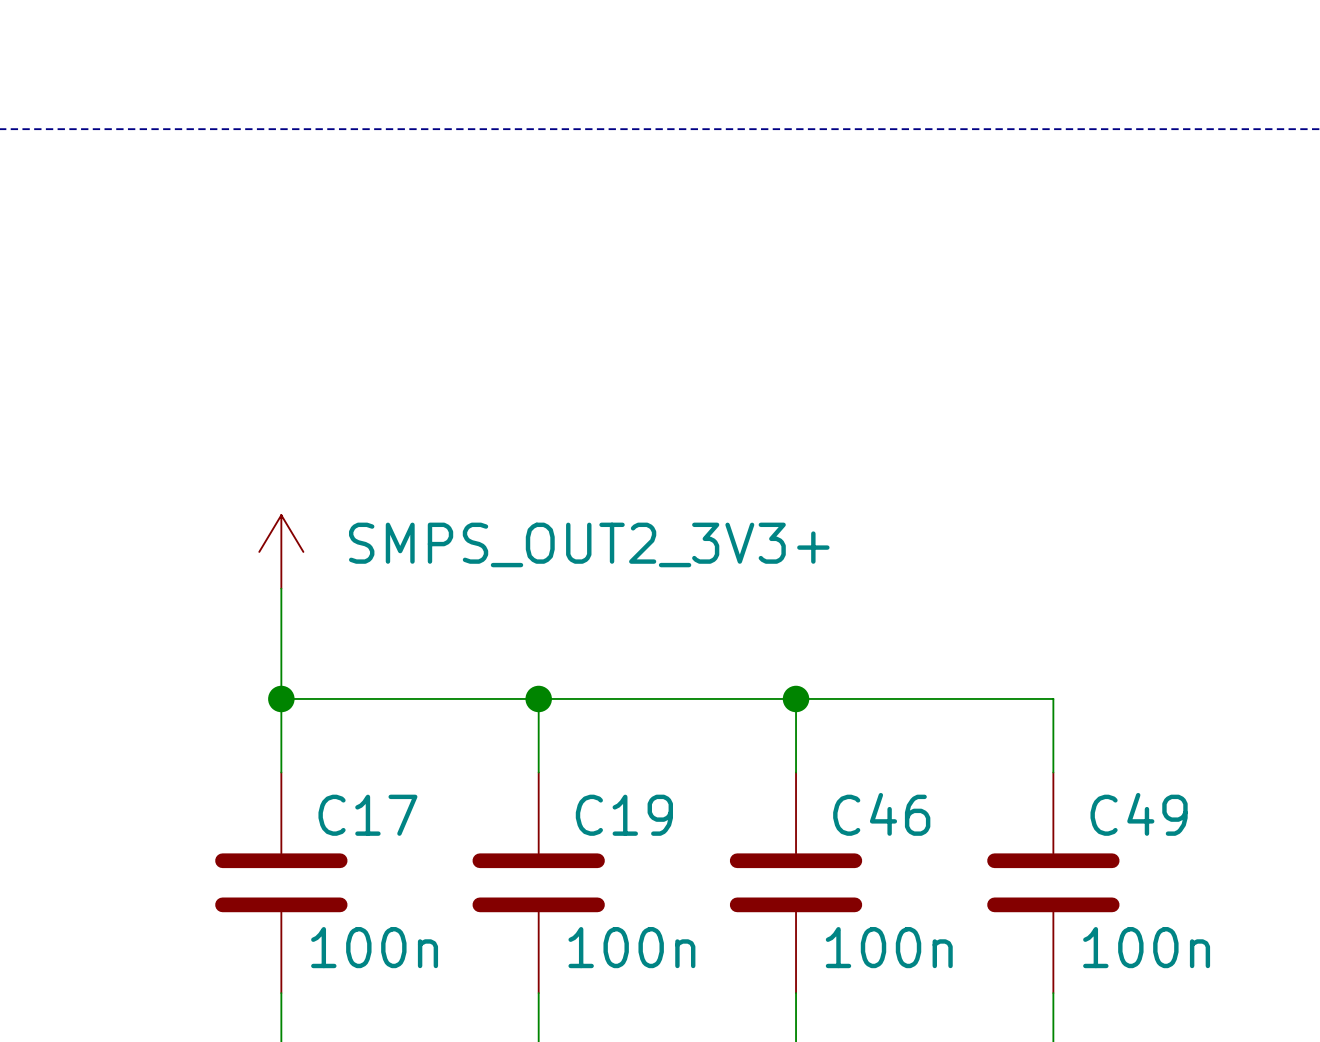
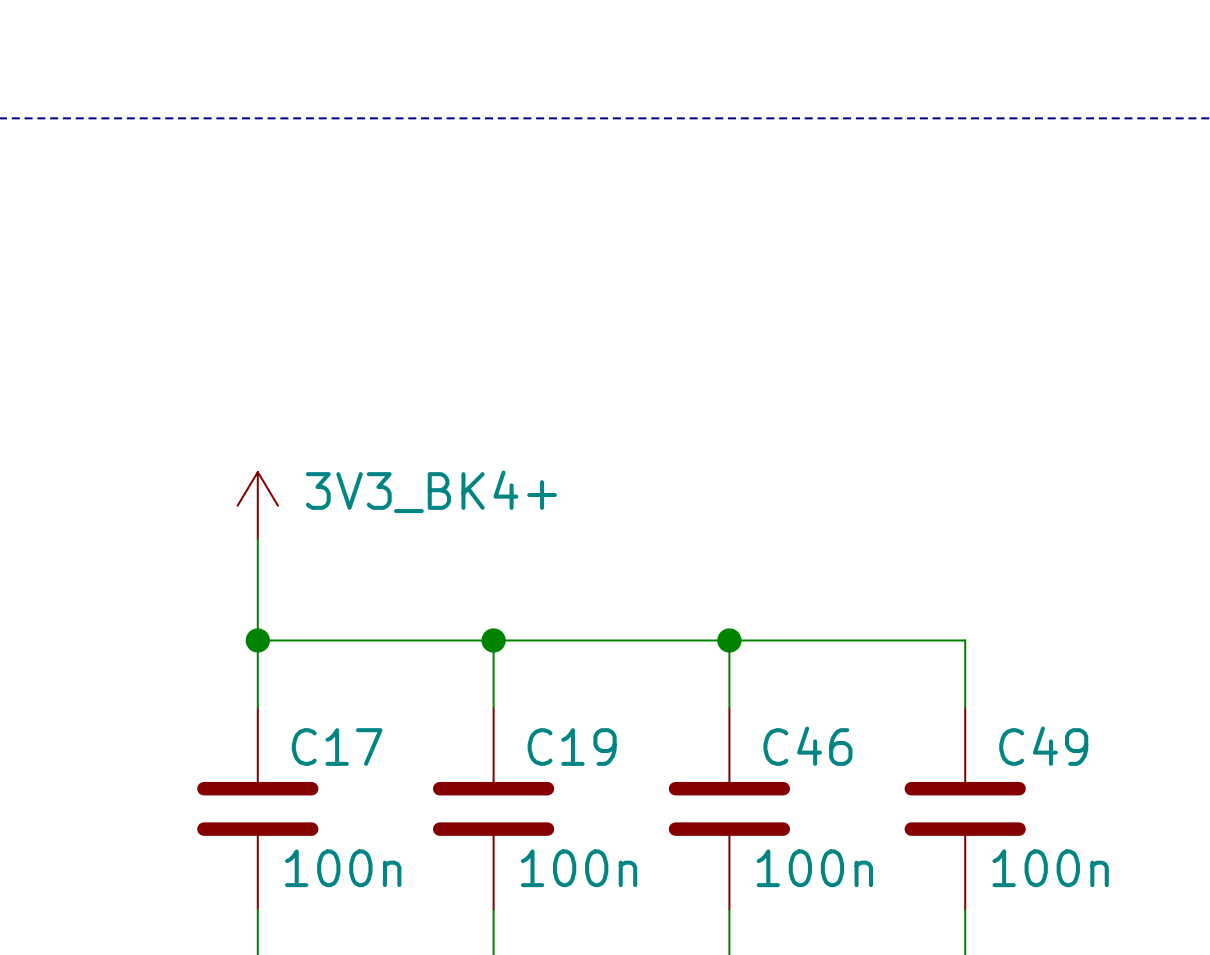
power symbol: SMPS_OUT2_3V3+ (281, 551) -> 3V3_BK4+ (257, 505)

